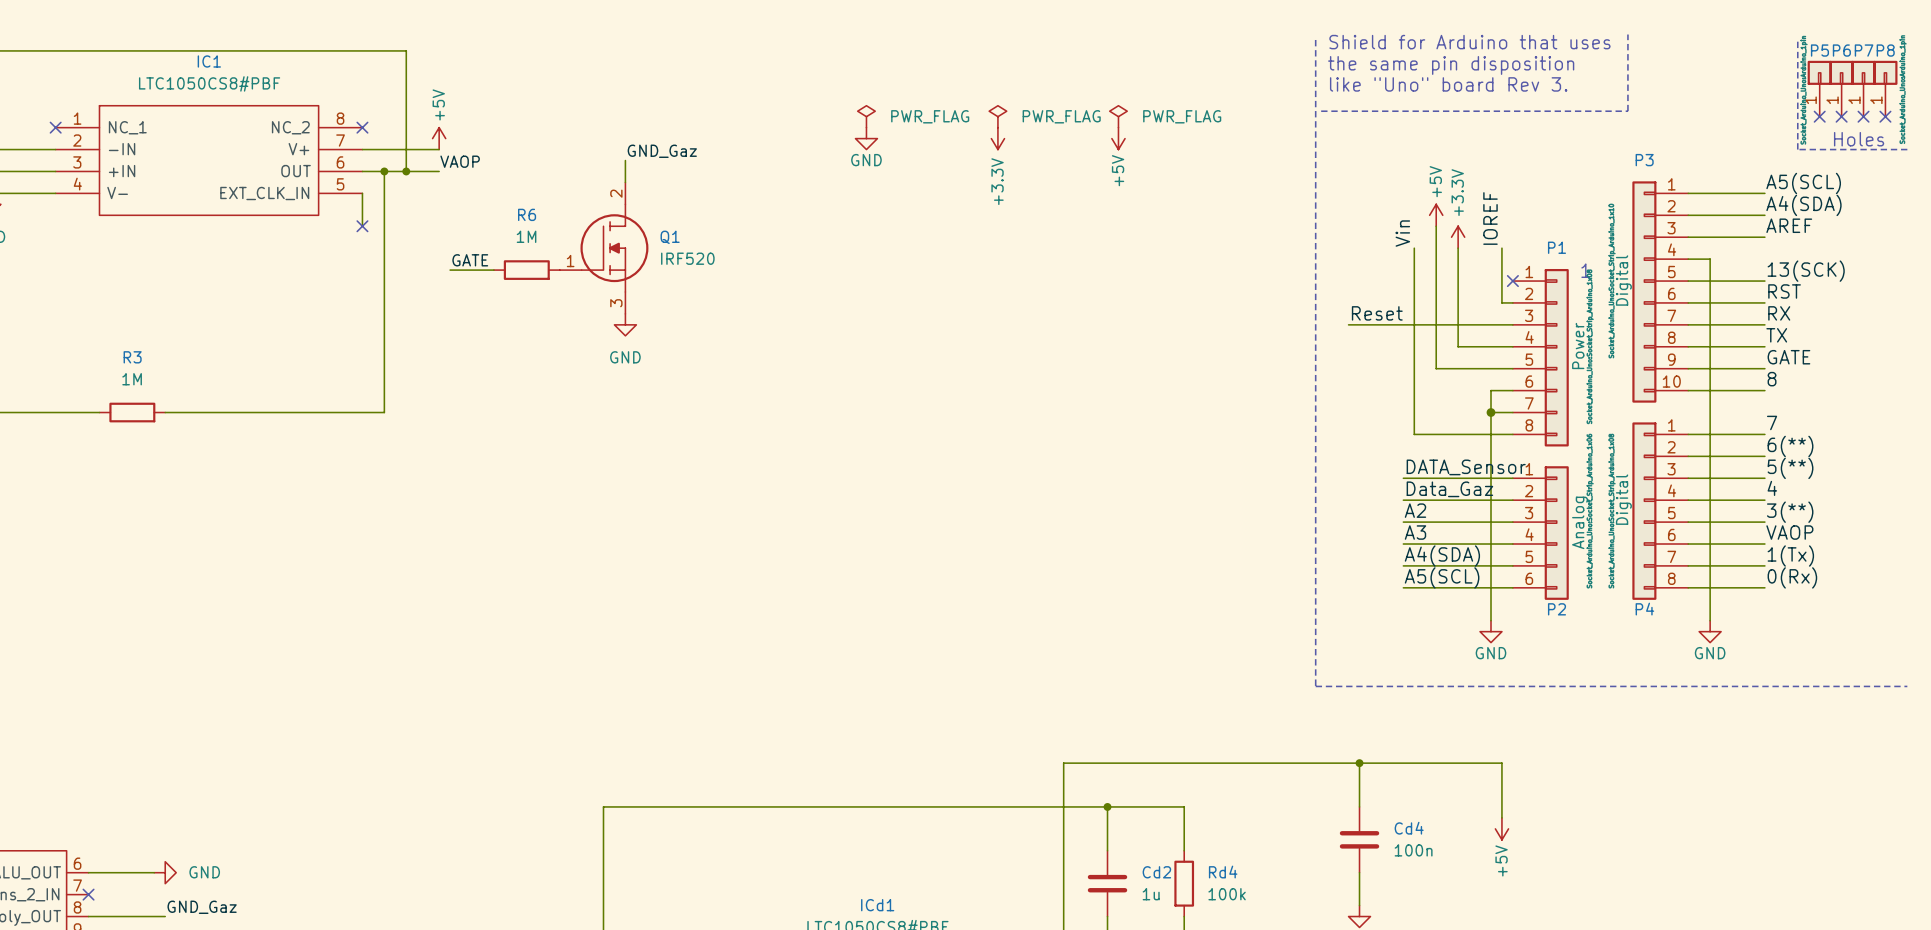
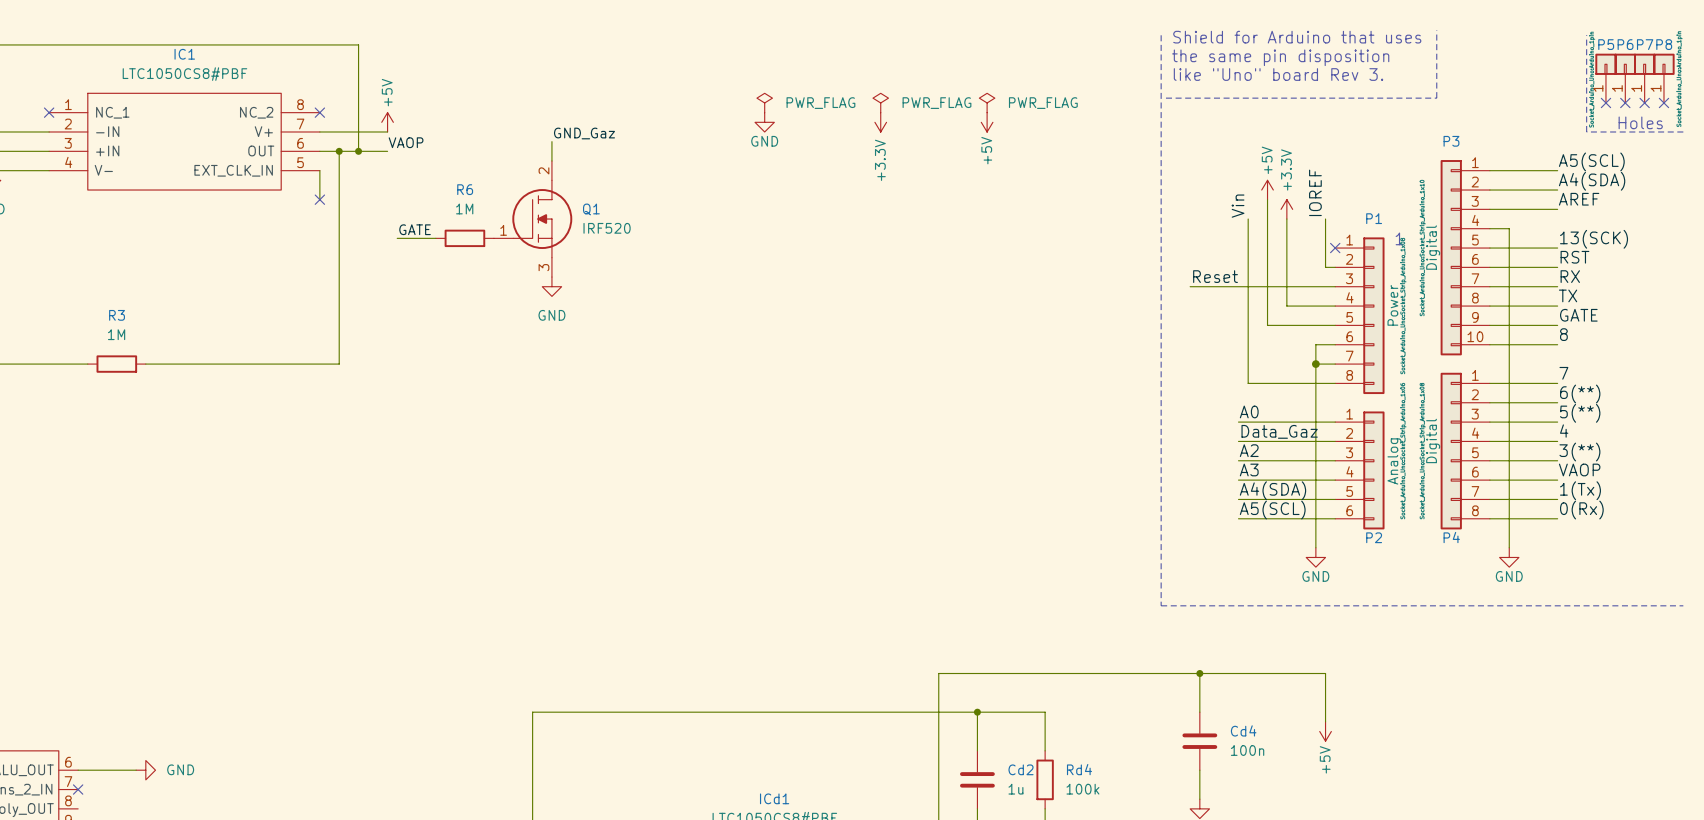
label: DATA_Sensor (1466, 467) -> A0 (1249, 411)
label: GND_Gaz (202, 907) -> none
wire: (88, 916) (165, 916) -> none

